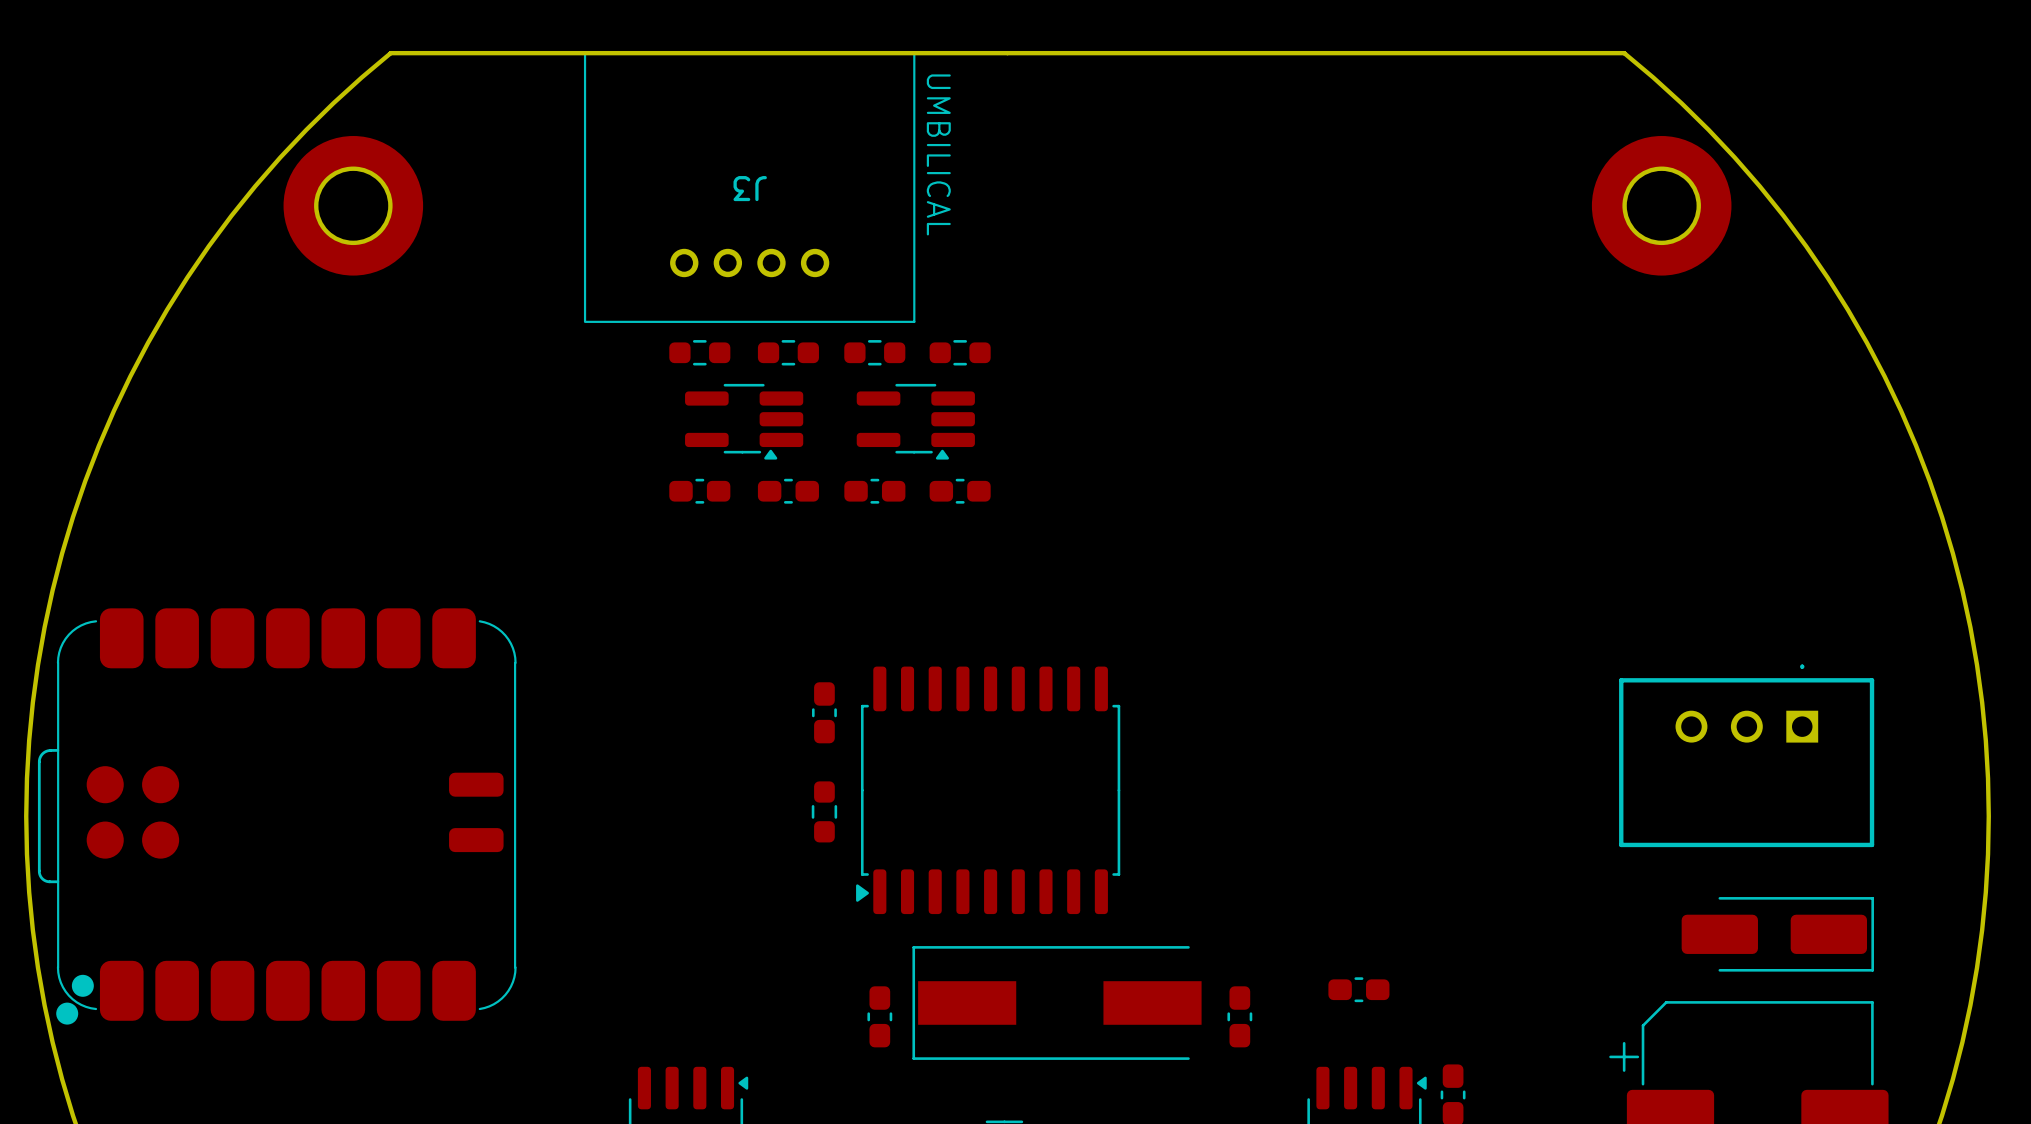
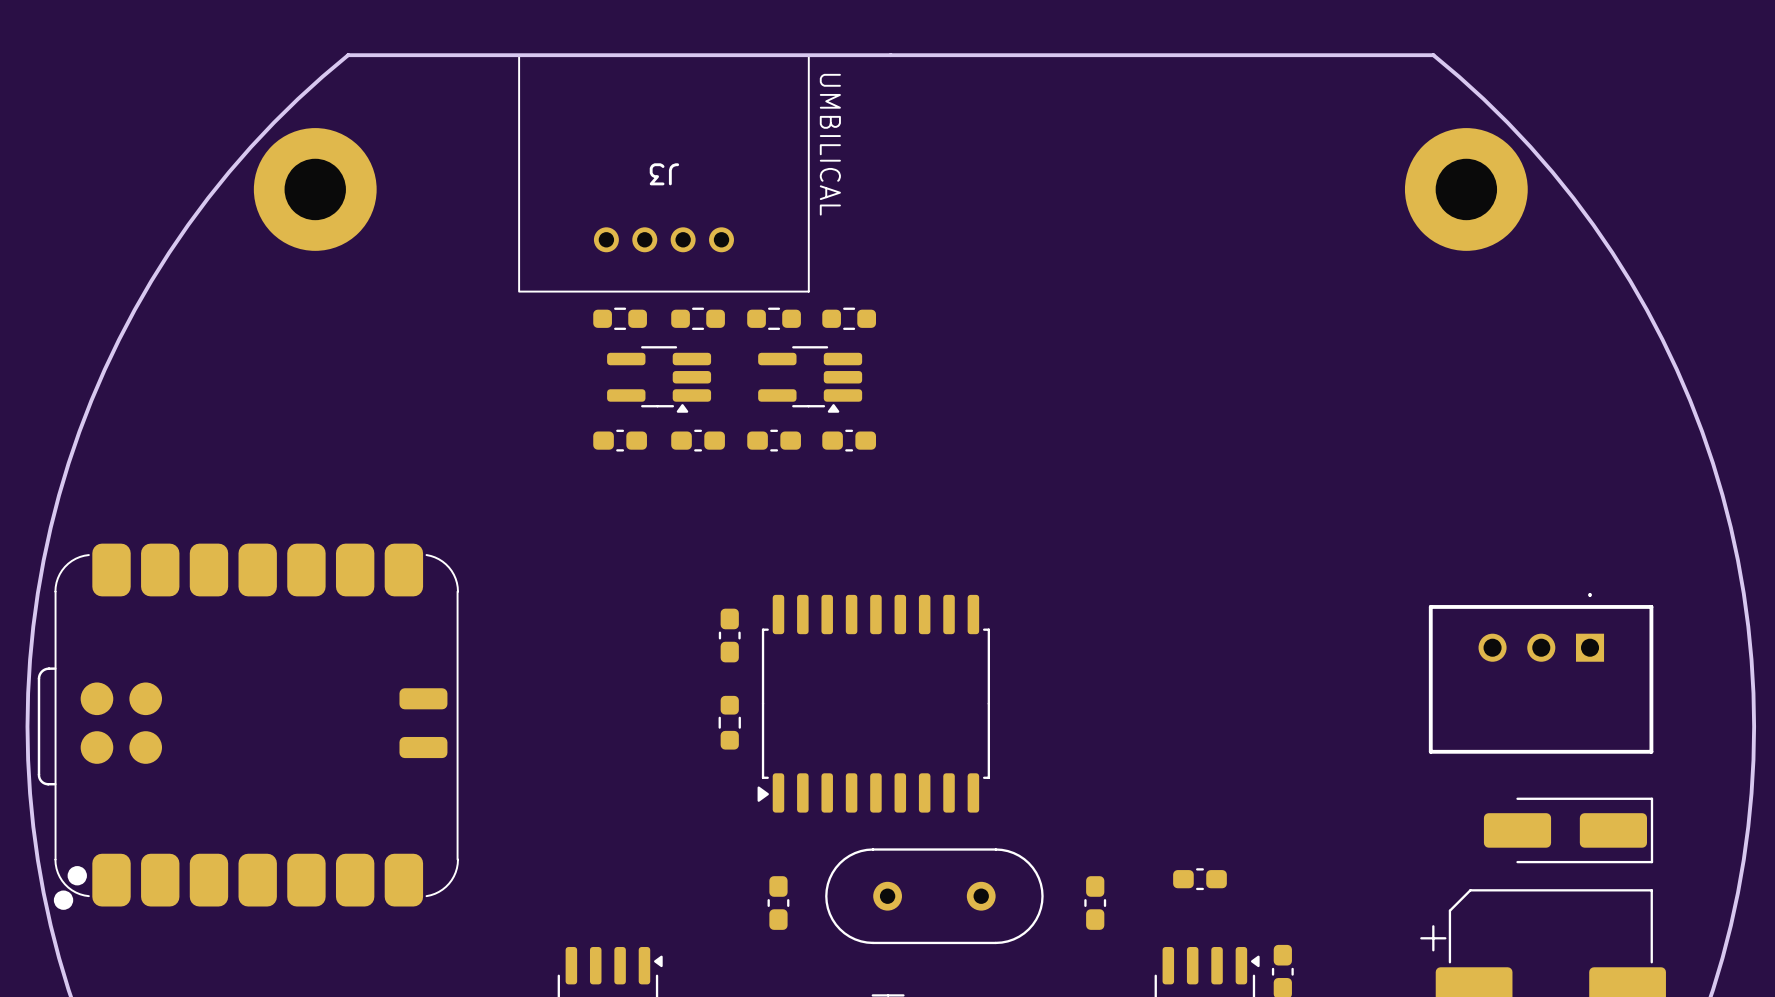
part footprint: [912, 946, 1202, 1060] -> [825, 848, 1044, 945]

